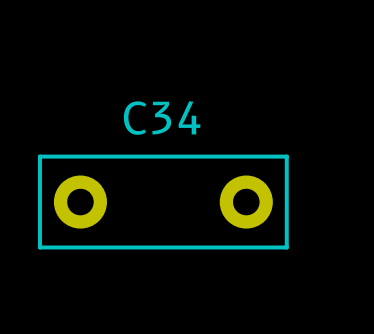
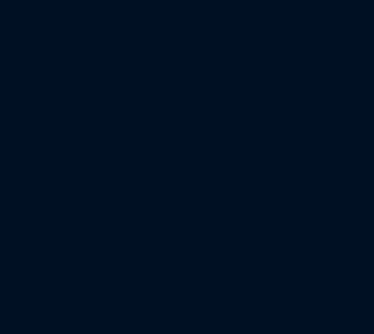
C34: (163, 202) -> none

